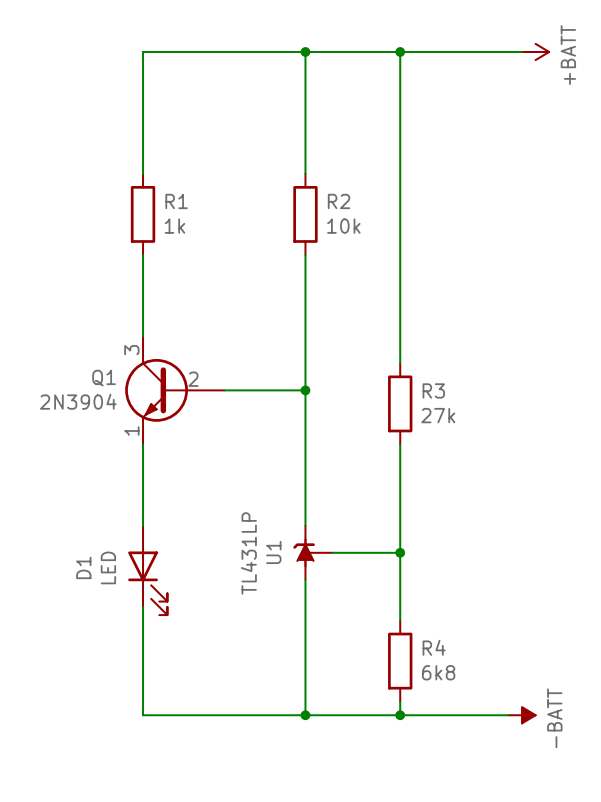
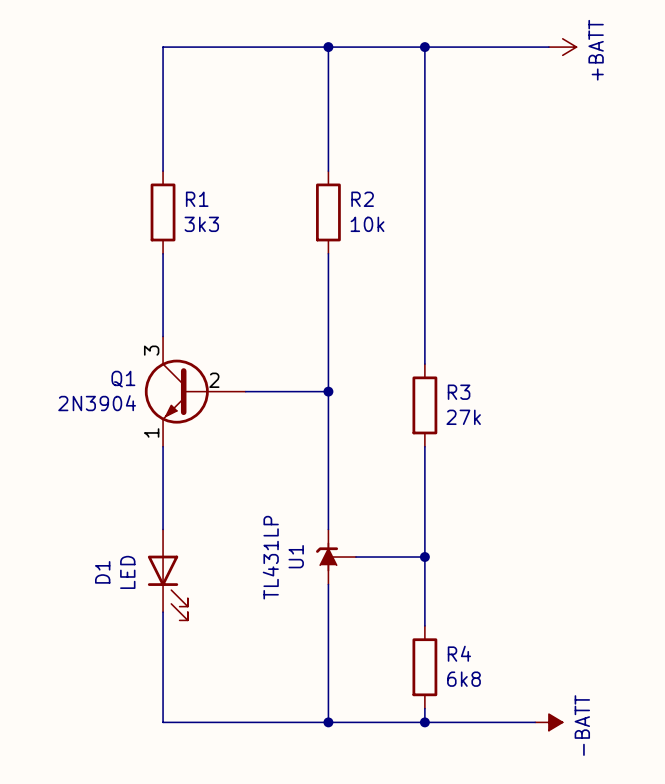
R1 value: 1k (174, 226) -> 3k3 (201, 224)

